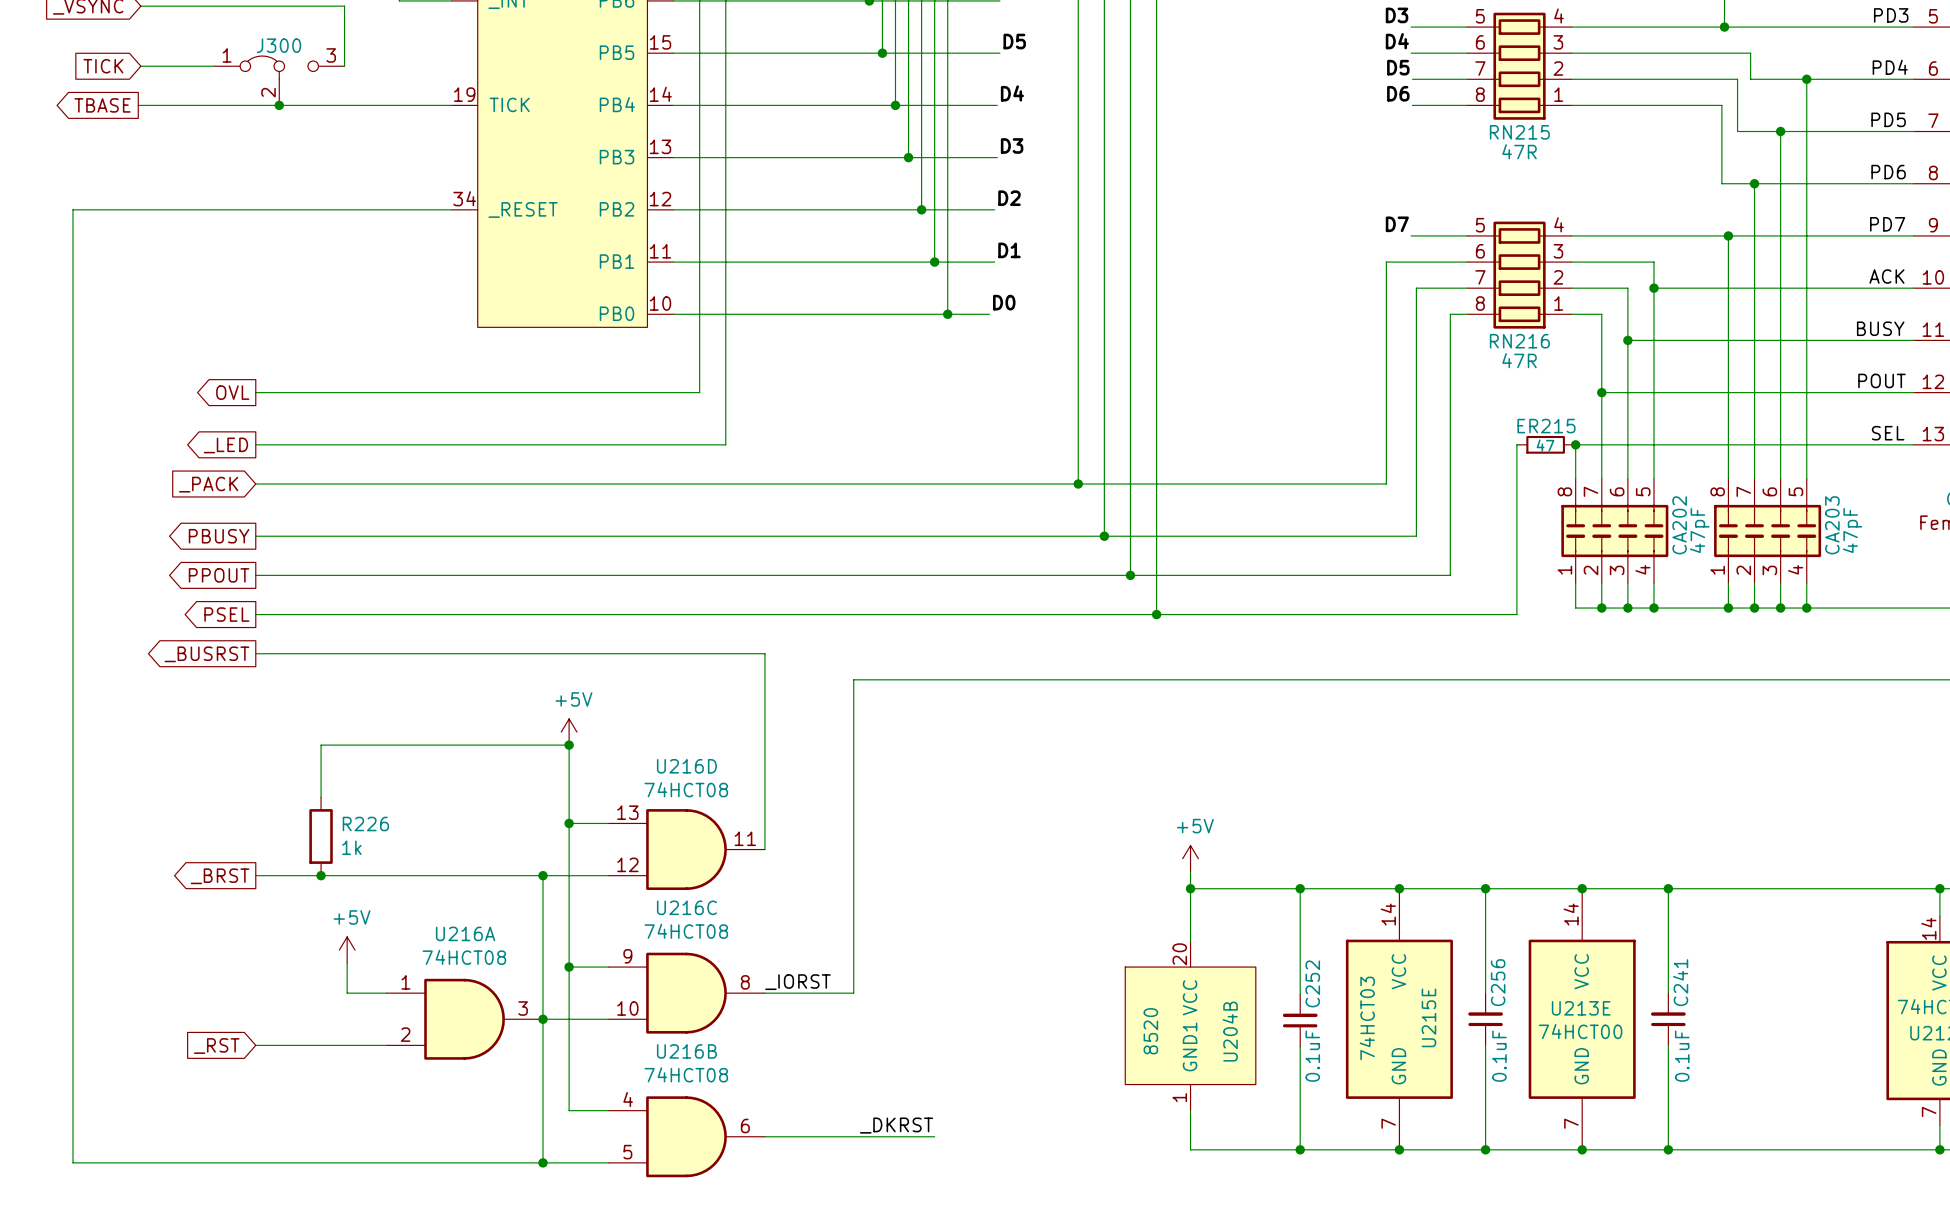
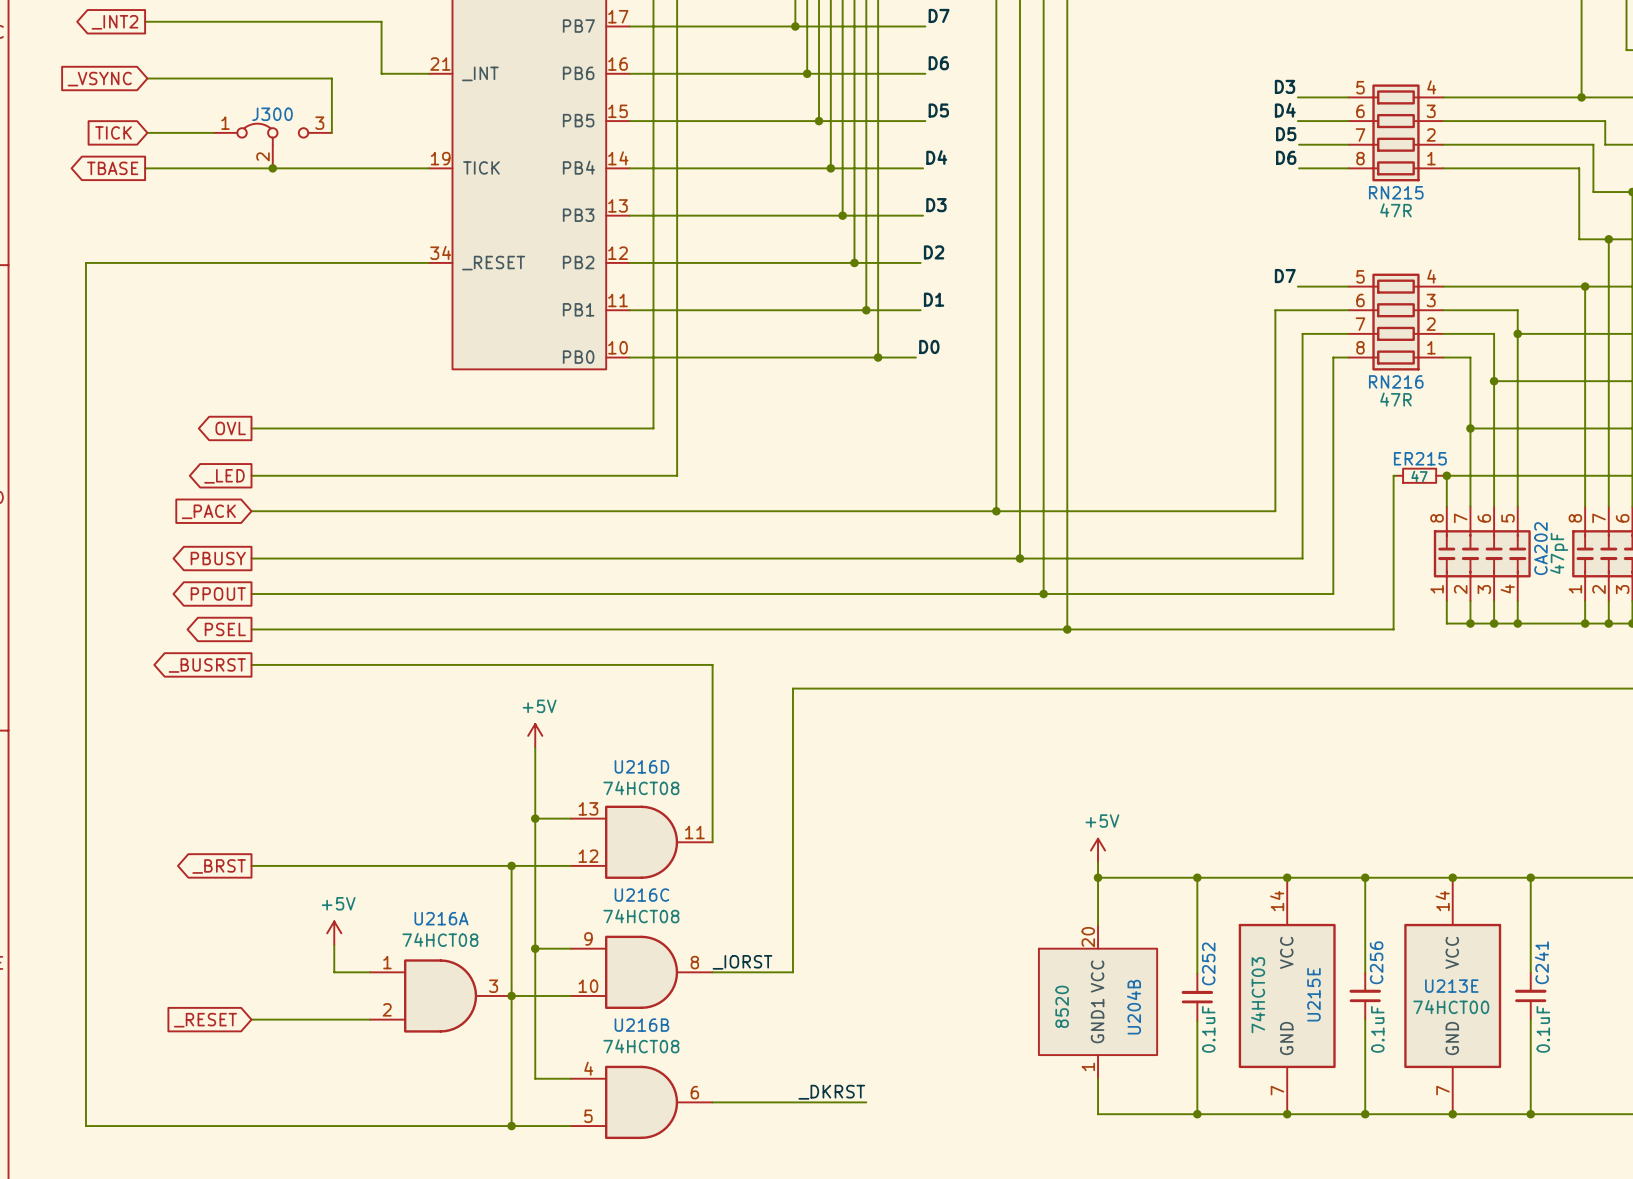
wire: (569, 745) (321, 745) (321, 797) -> none
junction: (569, 745) -> none
R226: 1k (321, 836) -> none
junction: (321, 875) -> none
global label: _RST (216, 1046) -> _RESET (205, 1020)

